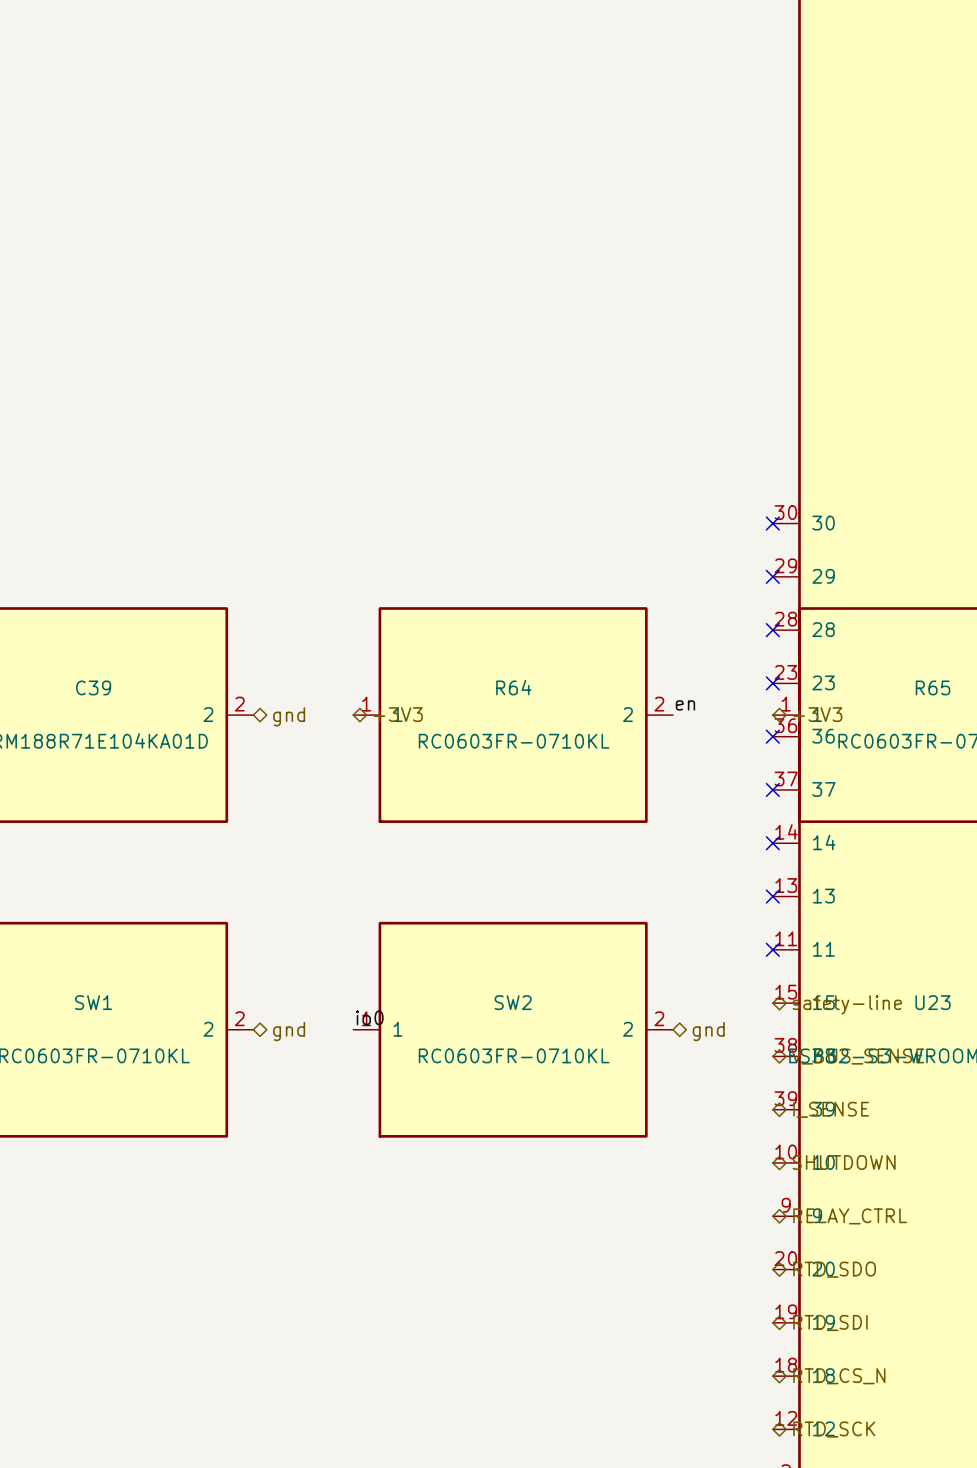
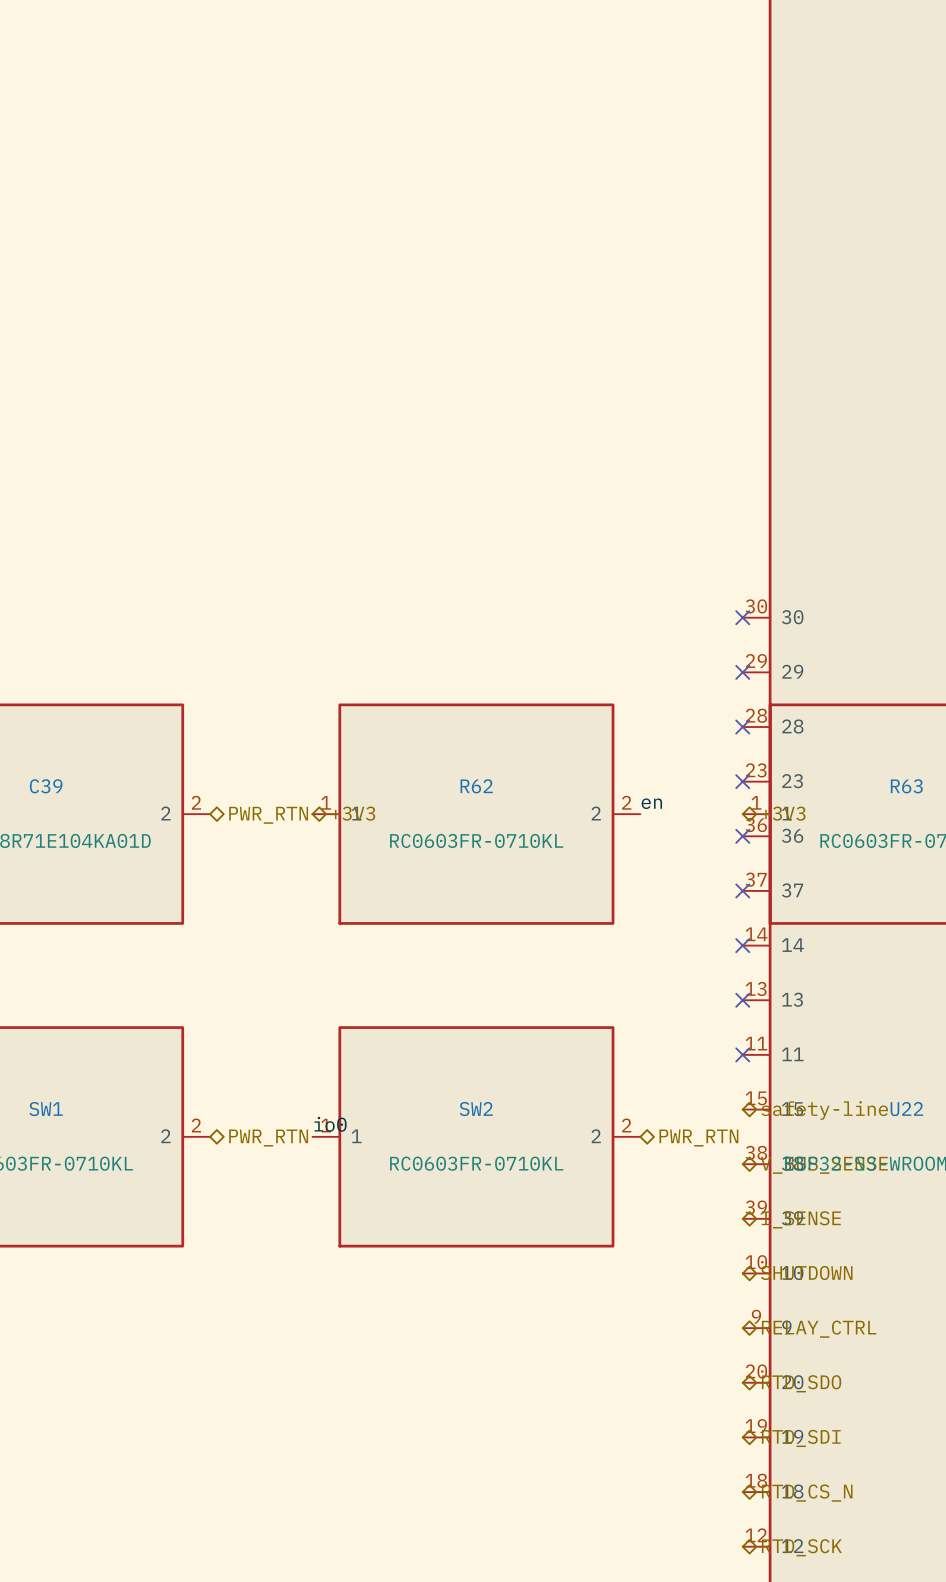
R64 name: R64 (513, 687) -> R62 (476, 786)
R65 name: R65 (933, 687) -> R63 (906, 786)
hierarchical label: gnd (289, 716) -> PWR_RTN (268, 815)
U23 name: U23 (933, 1002) -> U22 (906, 1109)
hierarchical label: gnd (289, 1031) -> PWR_RTN (268, 1138)
hierarchical label: gnd (708, 1031) -> PWR_RTN (698, 1138)

